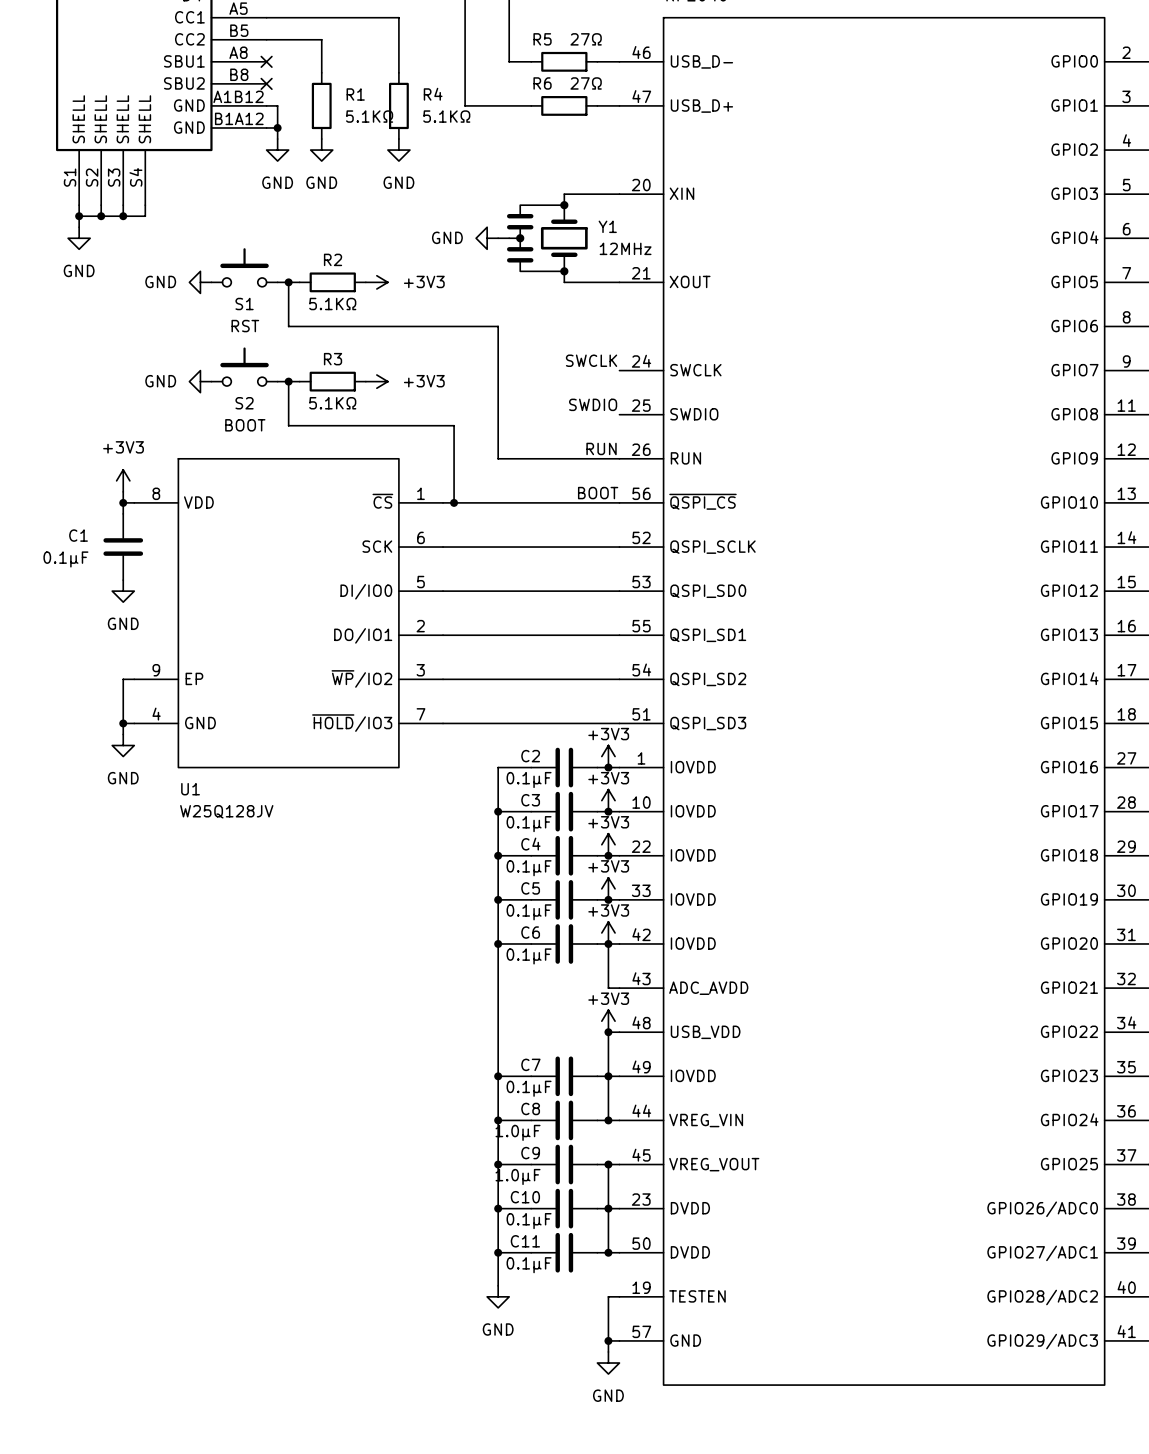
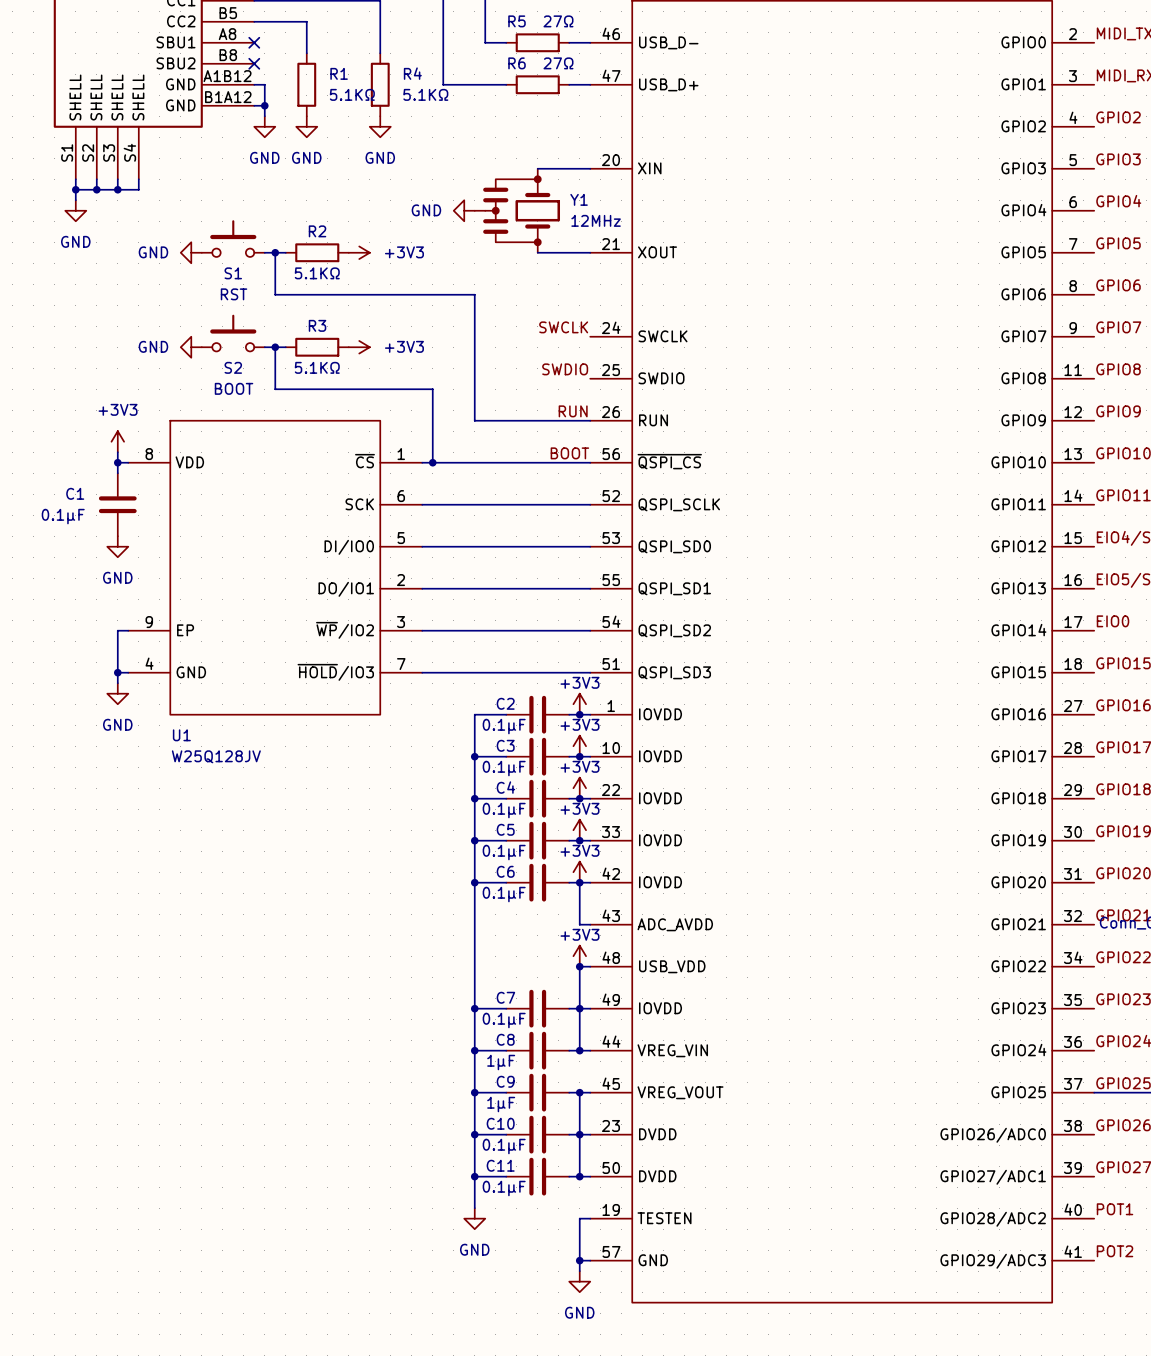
C8 value: 1.0μF (518, 1132) -> 1µF (501, 1062)
C9 value: 1.0μF (518, 1176) -> 1µF (501, 1104)

